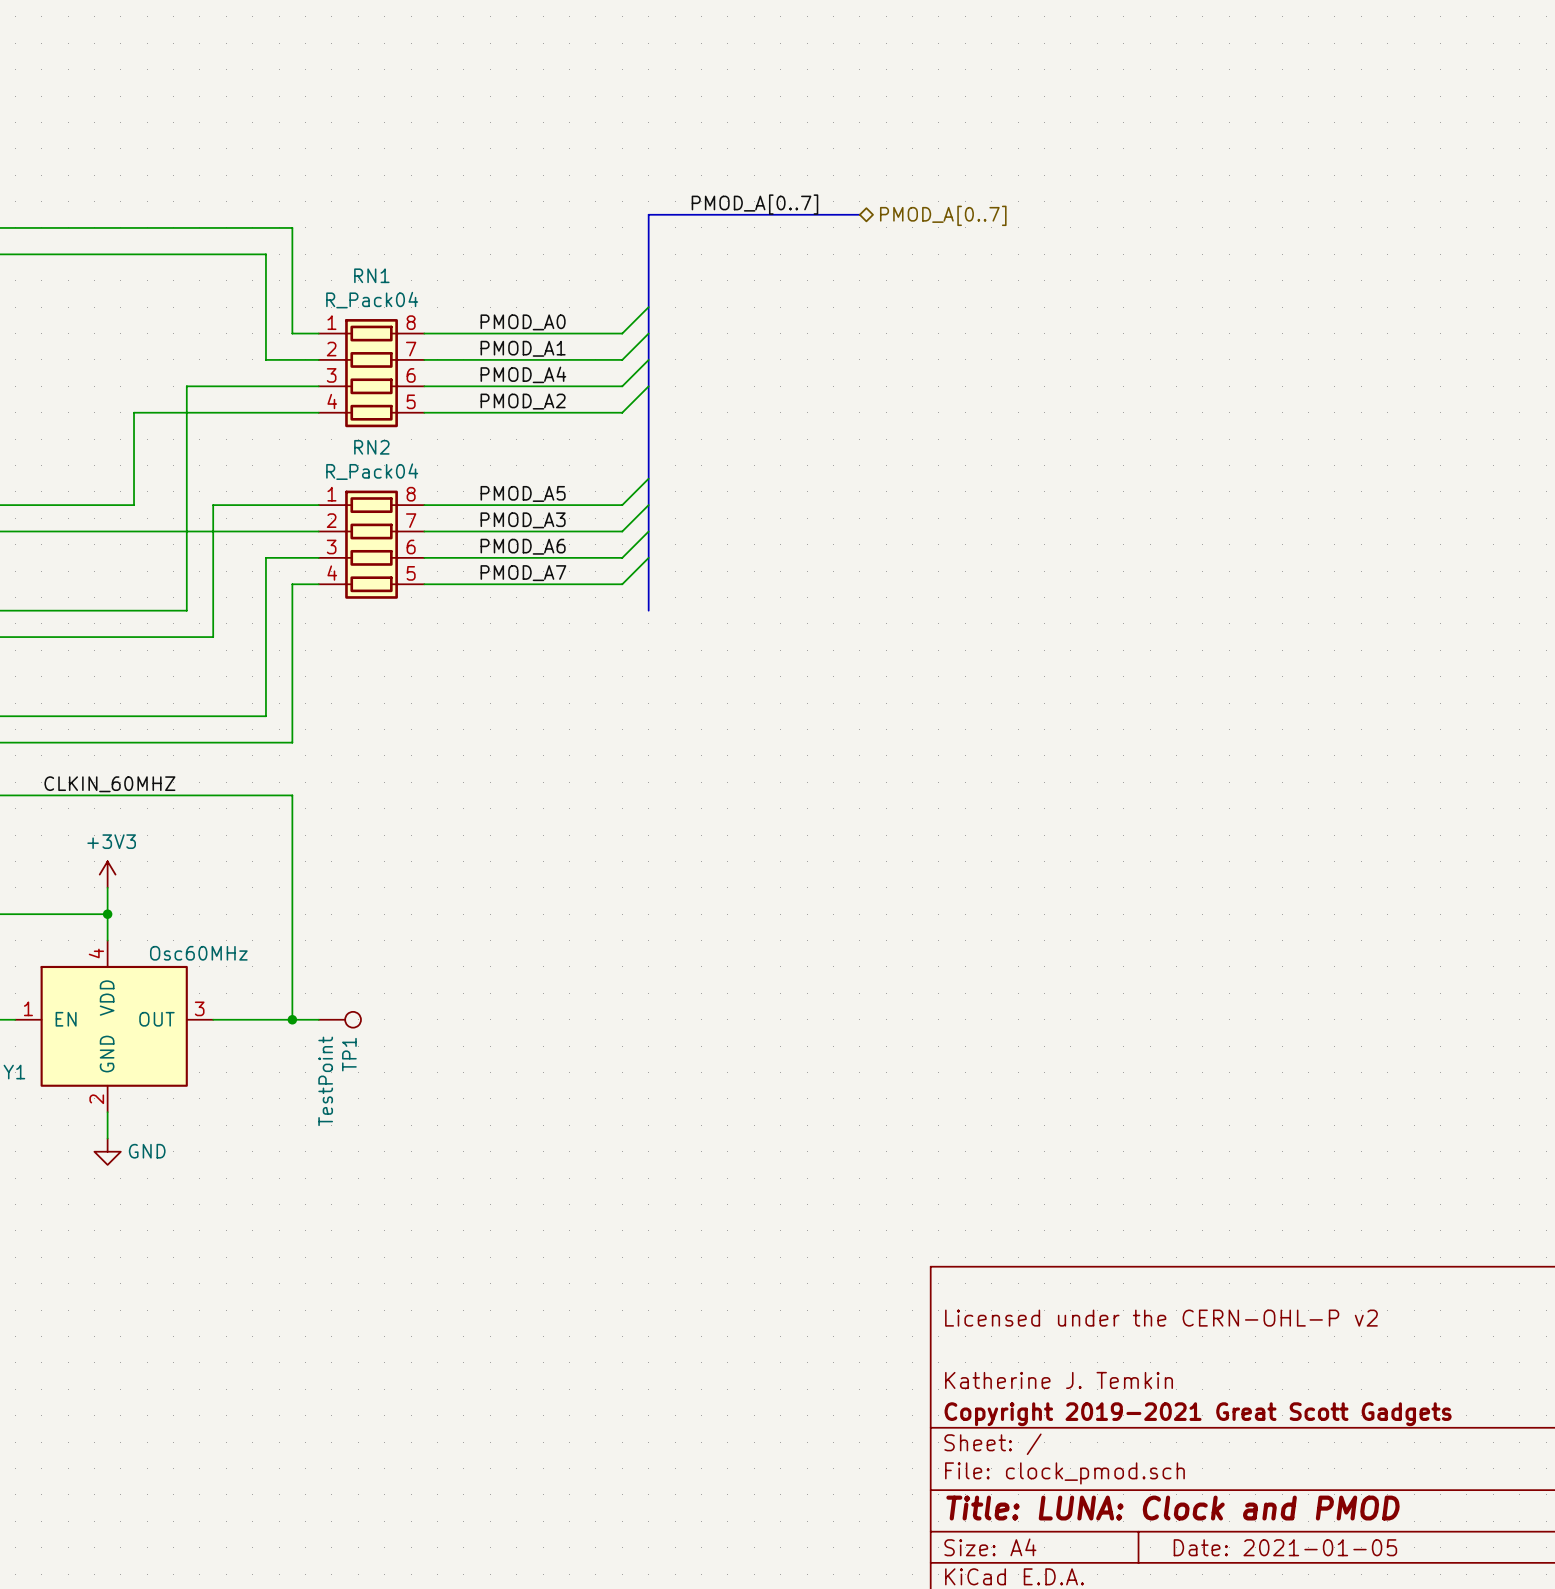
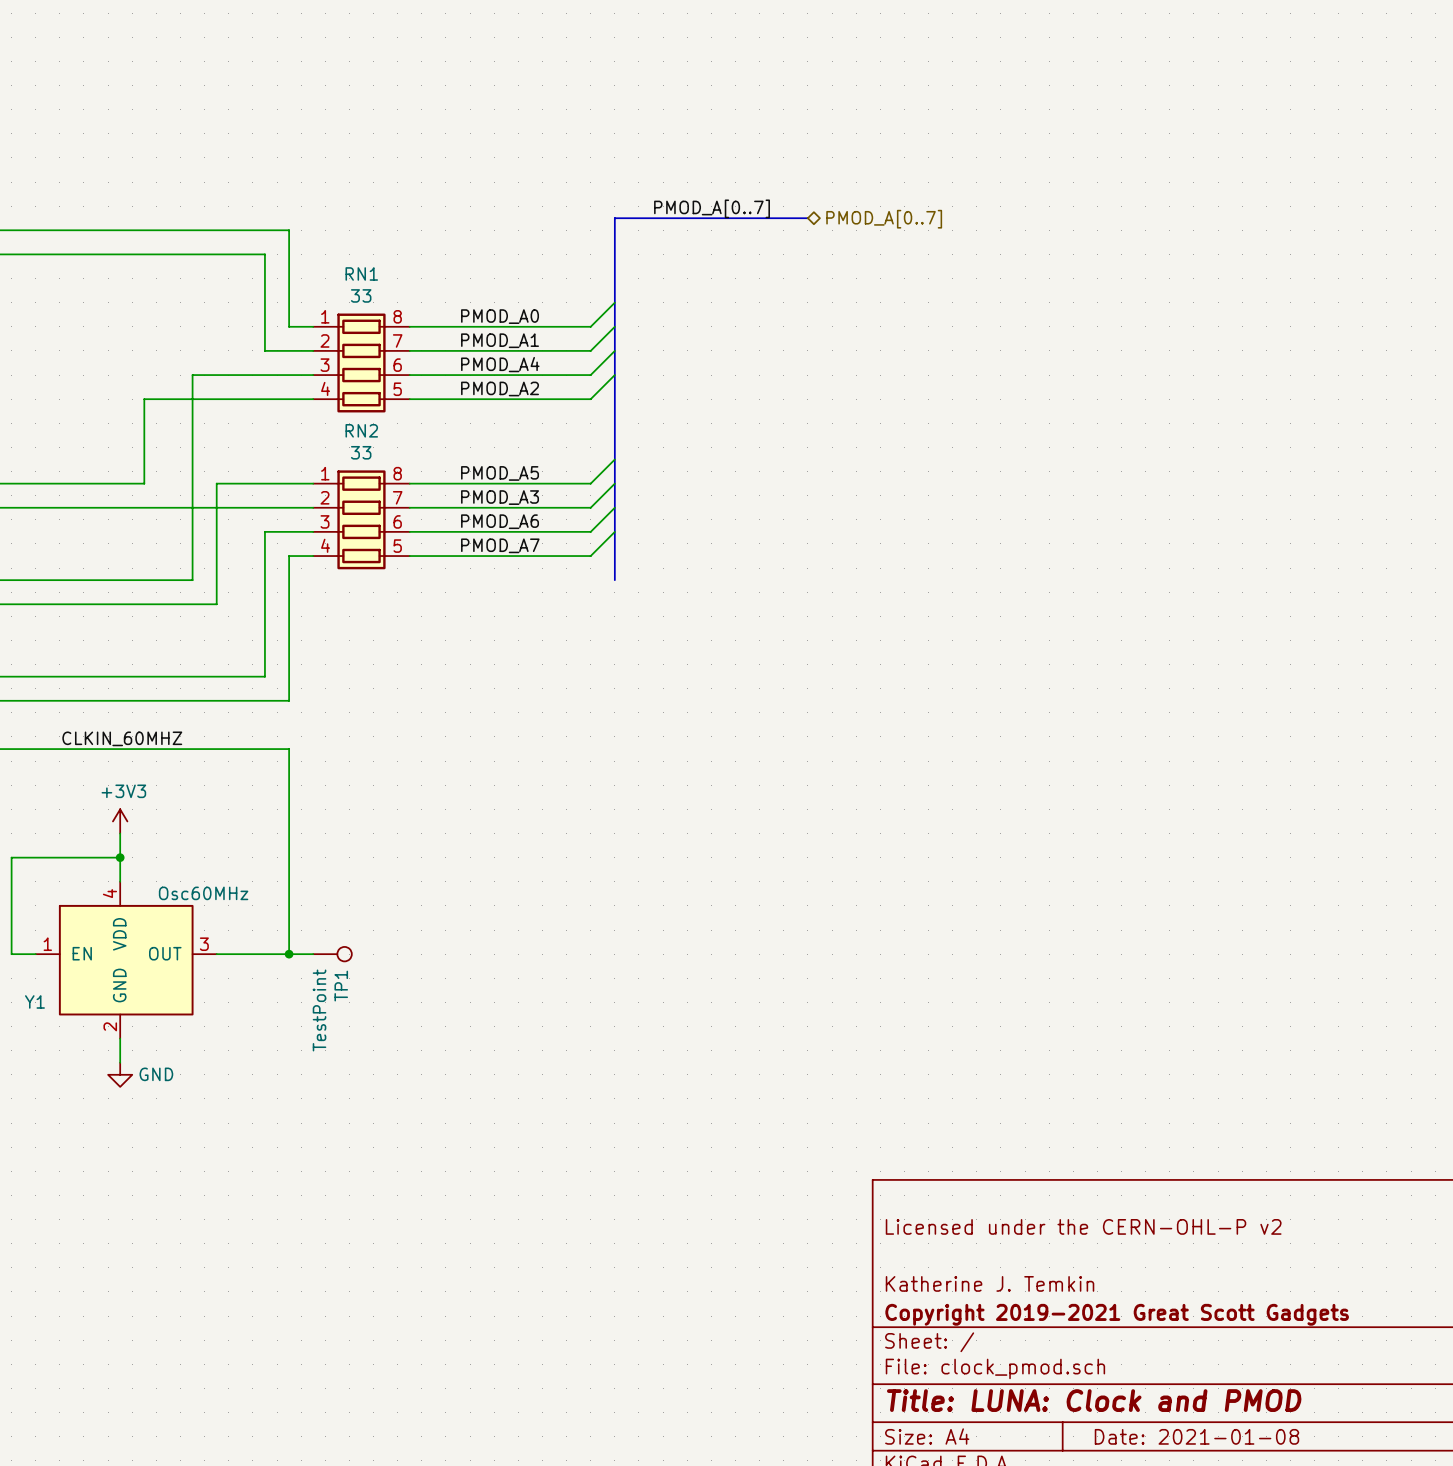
RN1 value: R_Pack04 (372, 300) -> 33 (361, 295)
RN2 value: R_Pack04 (372, 471) -> 33 (361, 452)
title block: Date: 2021-01-05 (1285, 1547) -> Date: 2021-01-08 (1196, 1436)

